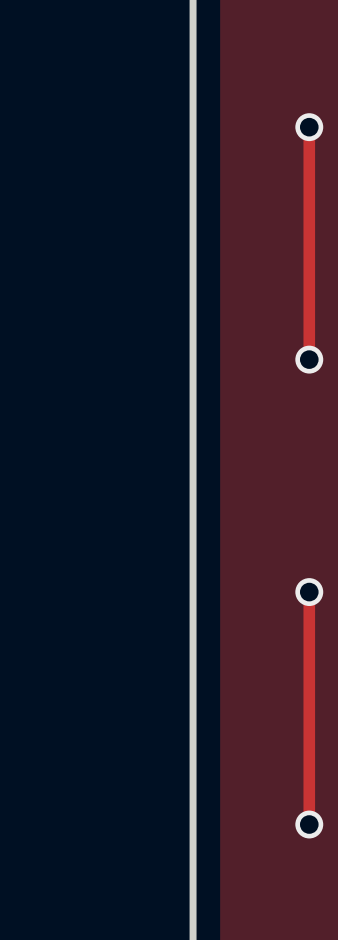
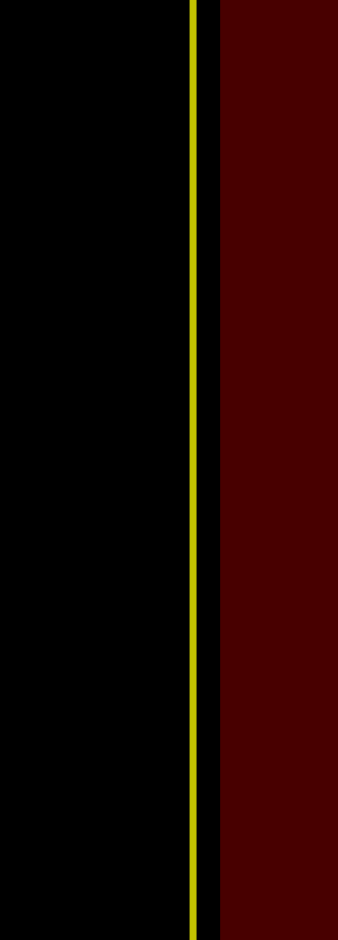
track: (309, 127) (309, 359) -> none
via: (309, 127) -> none
via: (309, 359) -> none
track: (309, 592) (309, 824) -> none
via: (309, 592) -> none
via: (309, 824) -> none

